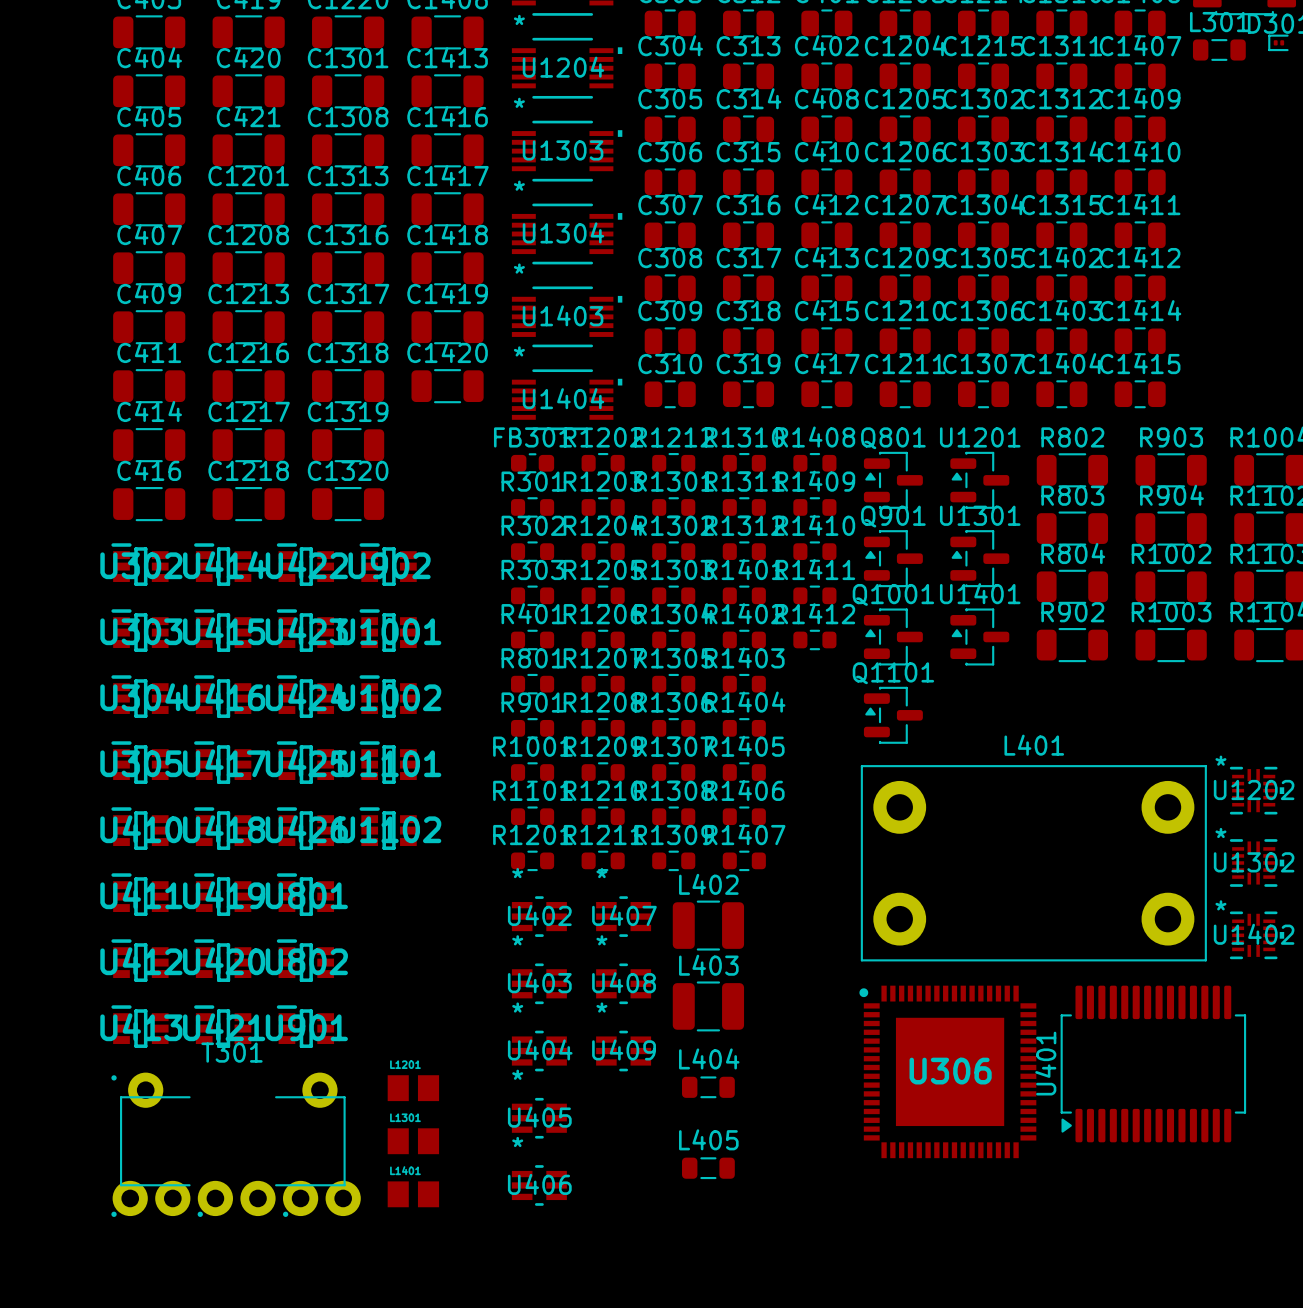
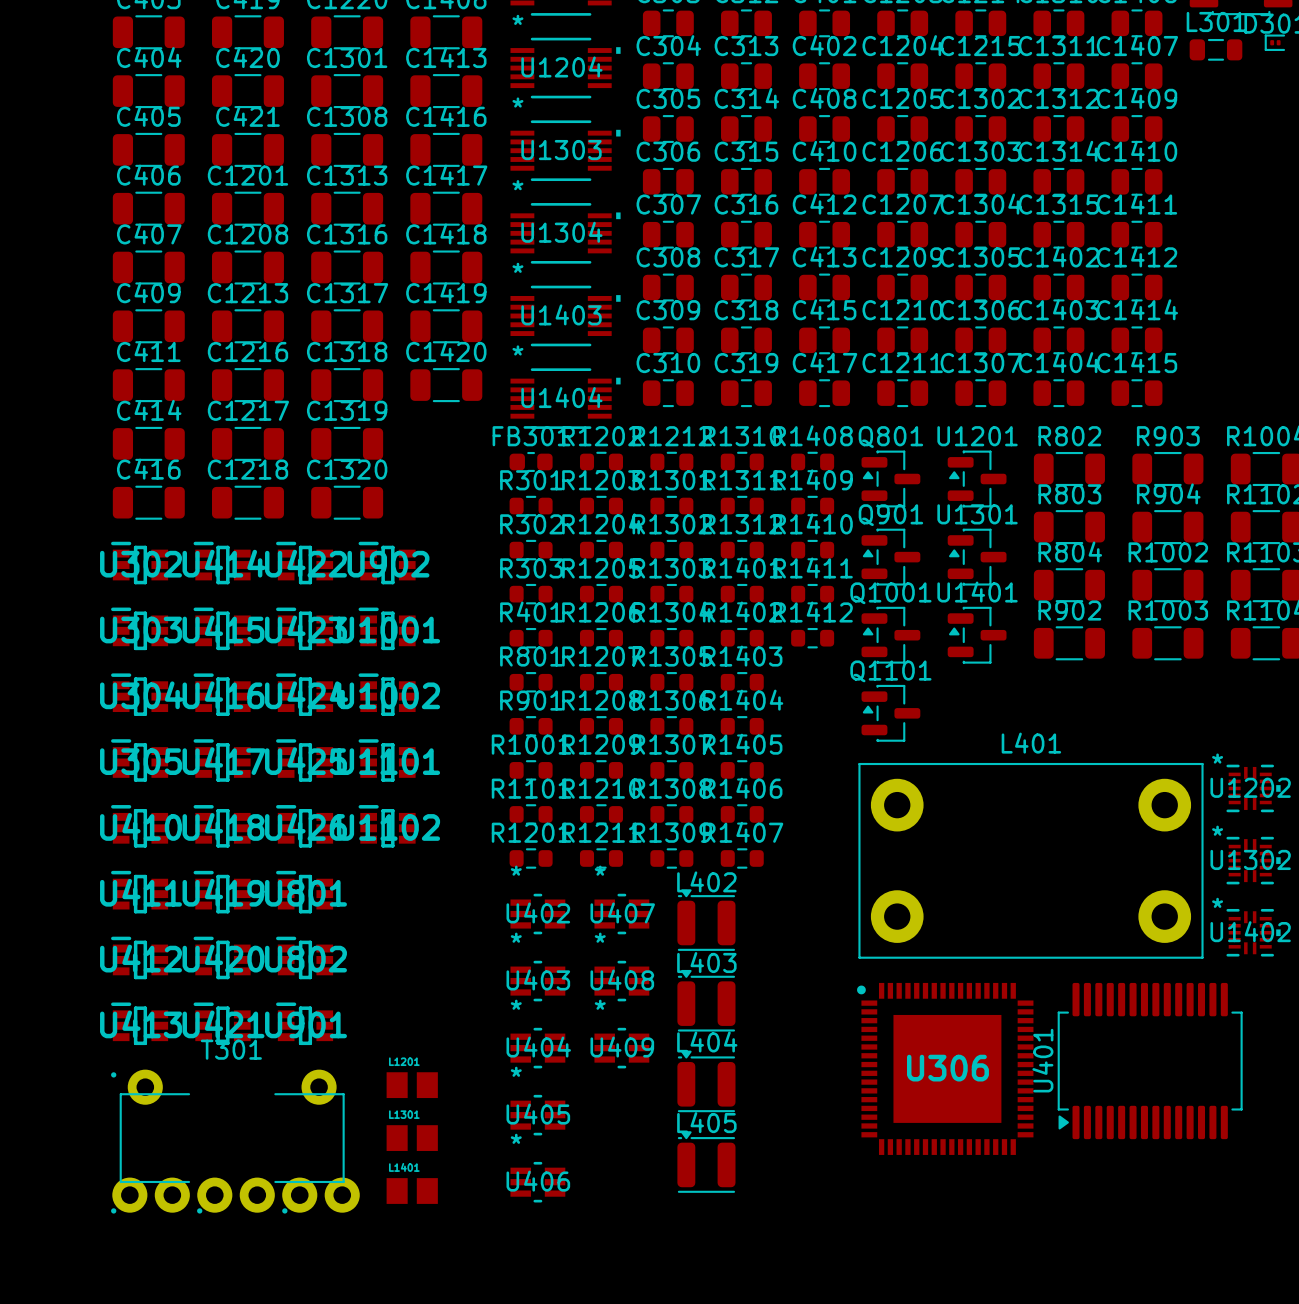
L402 footprint: [672, 900, 745, 951] -> [677, 889, 736, 951]
L403 footprint: [672, 981, 745, 1032] -> [677, 969, 736, 1032]
L404 footprint: [682, 1076, 735, 1099] -> [677, 1050, 736, 1113]
L405 footprint: [682, 1157, 735, 1180] -> [677, 1131, 736, 1193]

